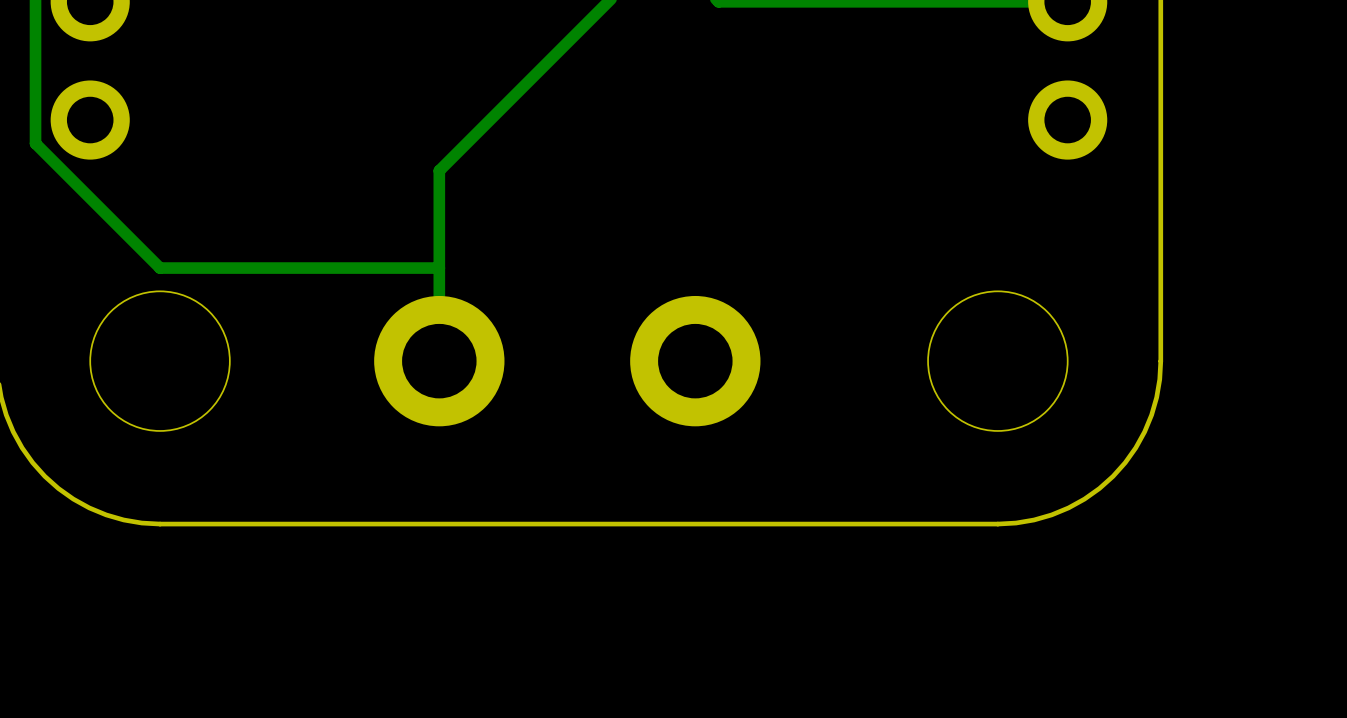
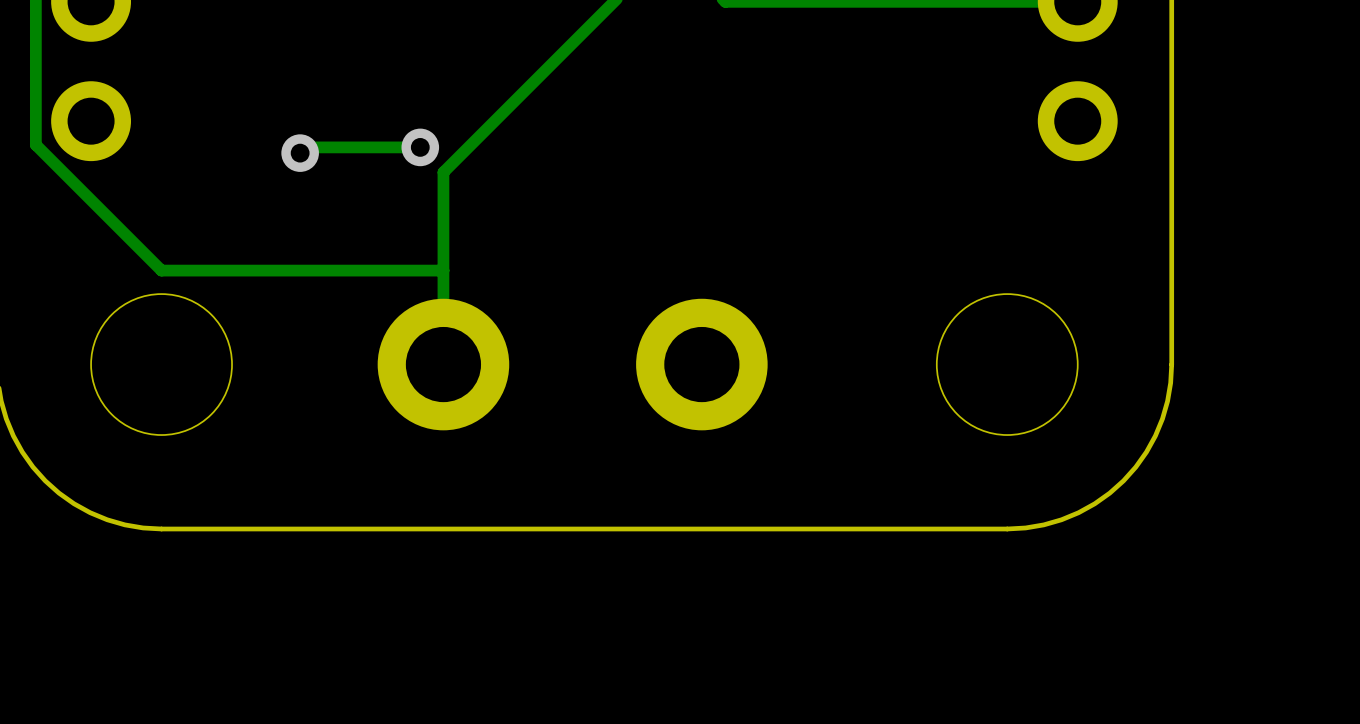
track: none -> (420, 147) (305, 147) (300, 153)
via: none -> (420, 147)
via: none -> (300, 153)

